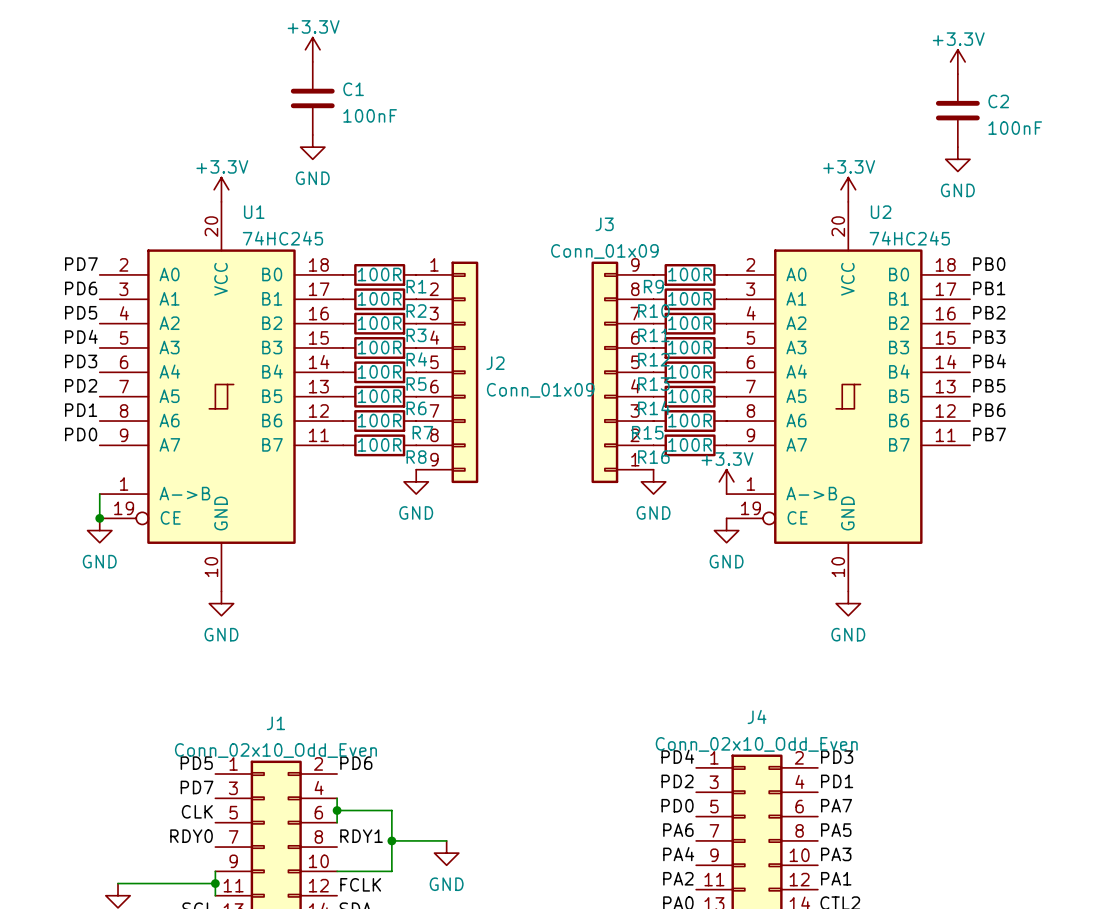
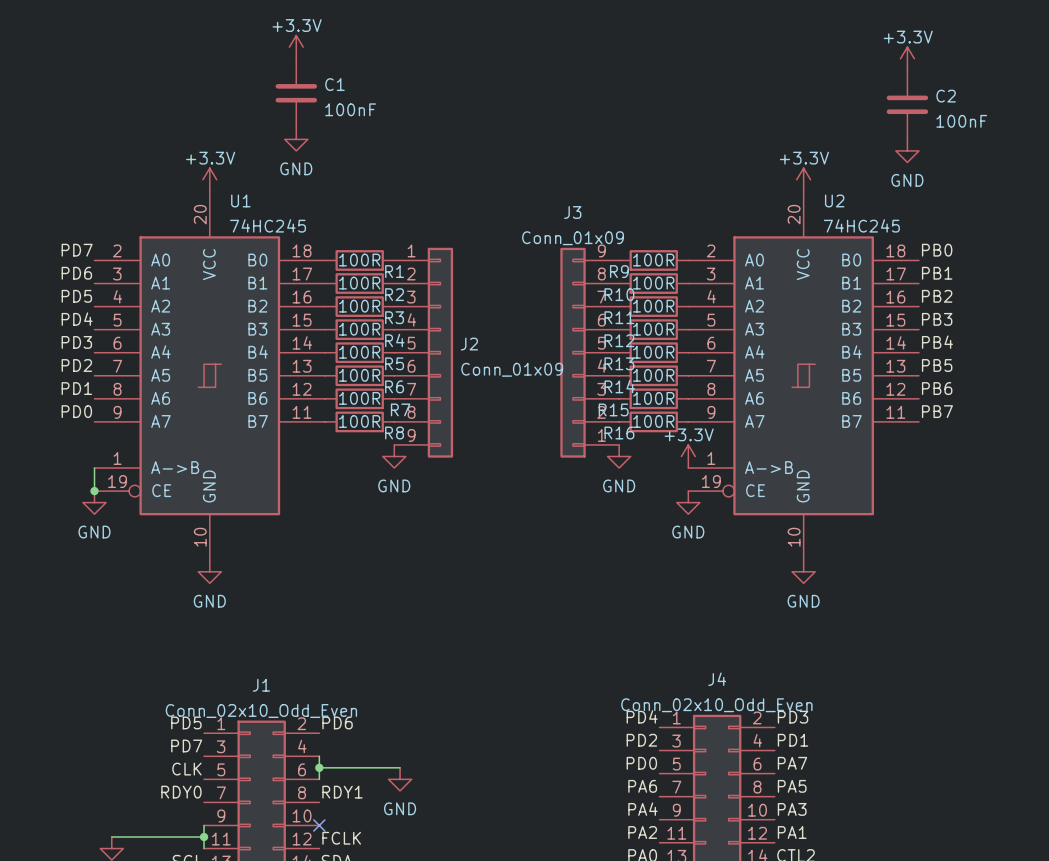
wire: (391, 810) (391, 871) (337, 871) -> (371, 767) (400, 767)
wire: (391, 840) (446, 840) -> none
junction: (391, 840) -> none
power symbol position: GND (446, 853) -> GND (400, 779)
no-connect mark: none -> (319, 825)

